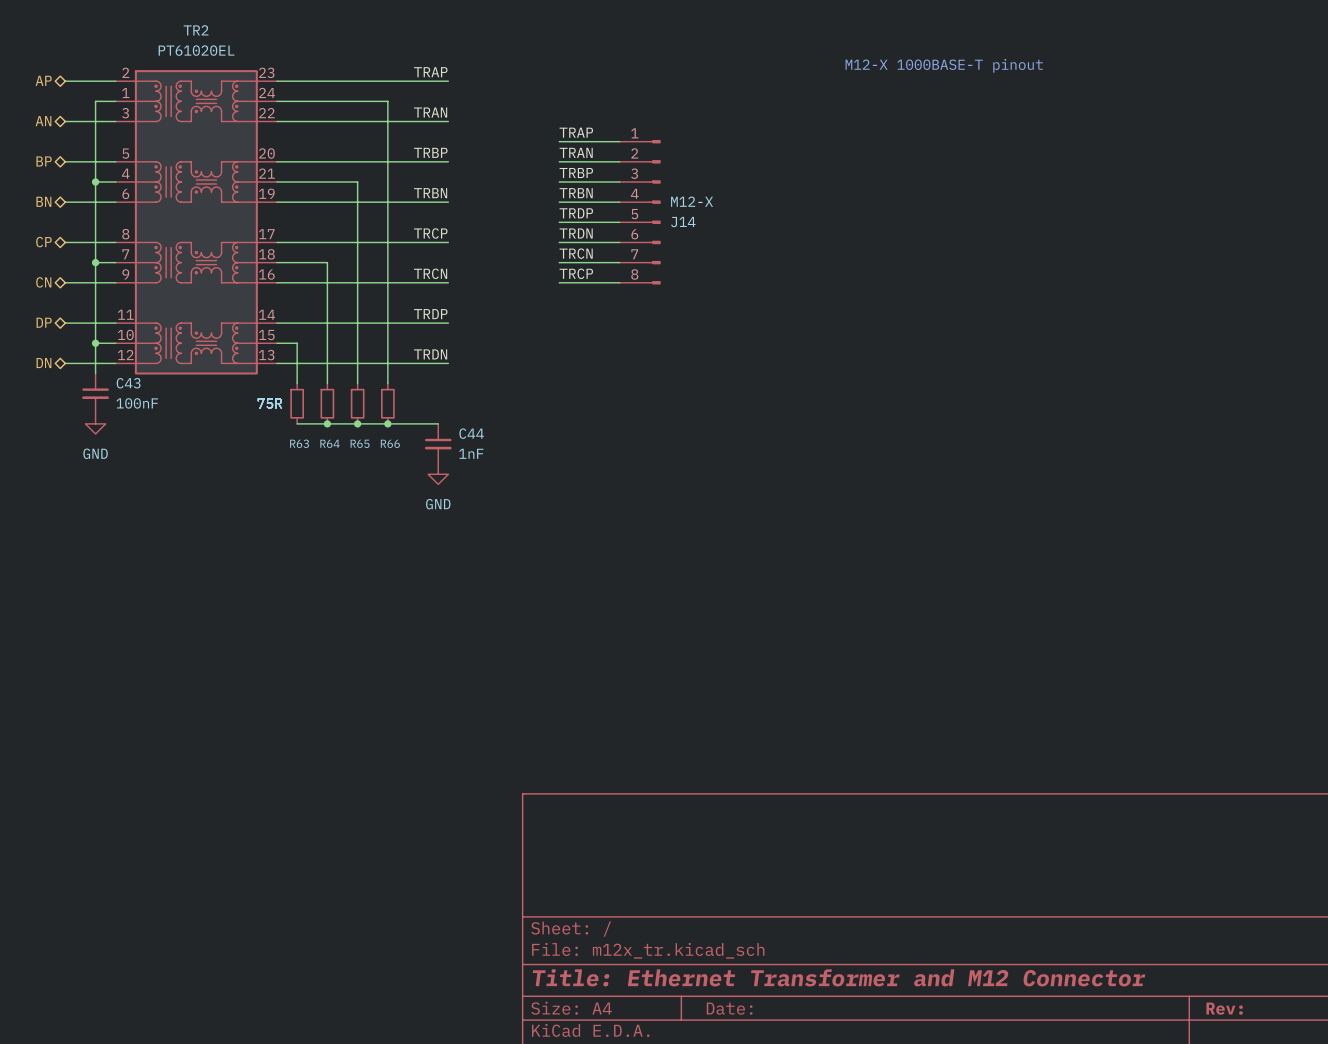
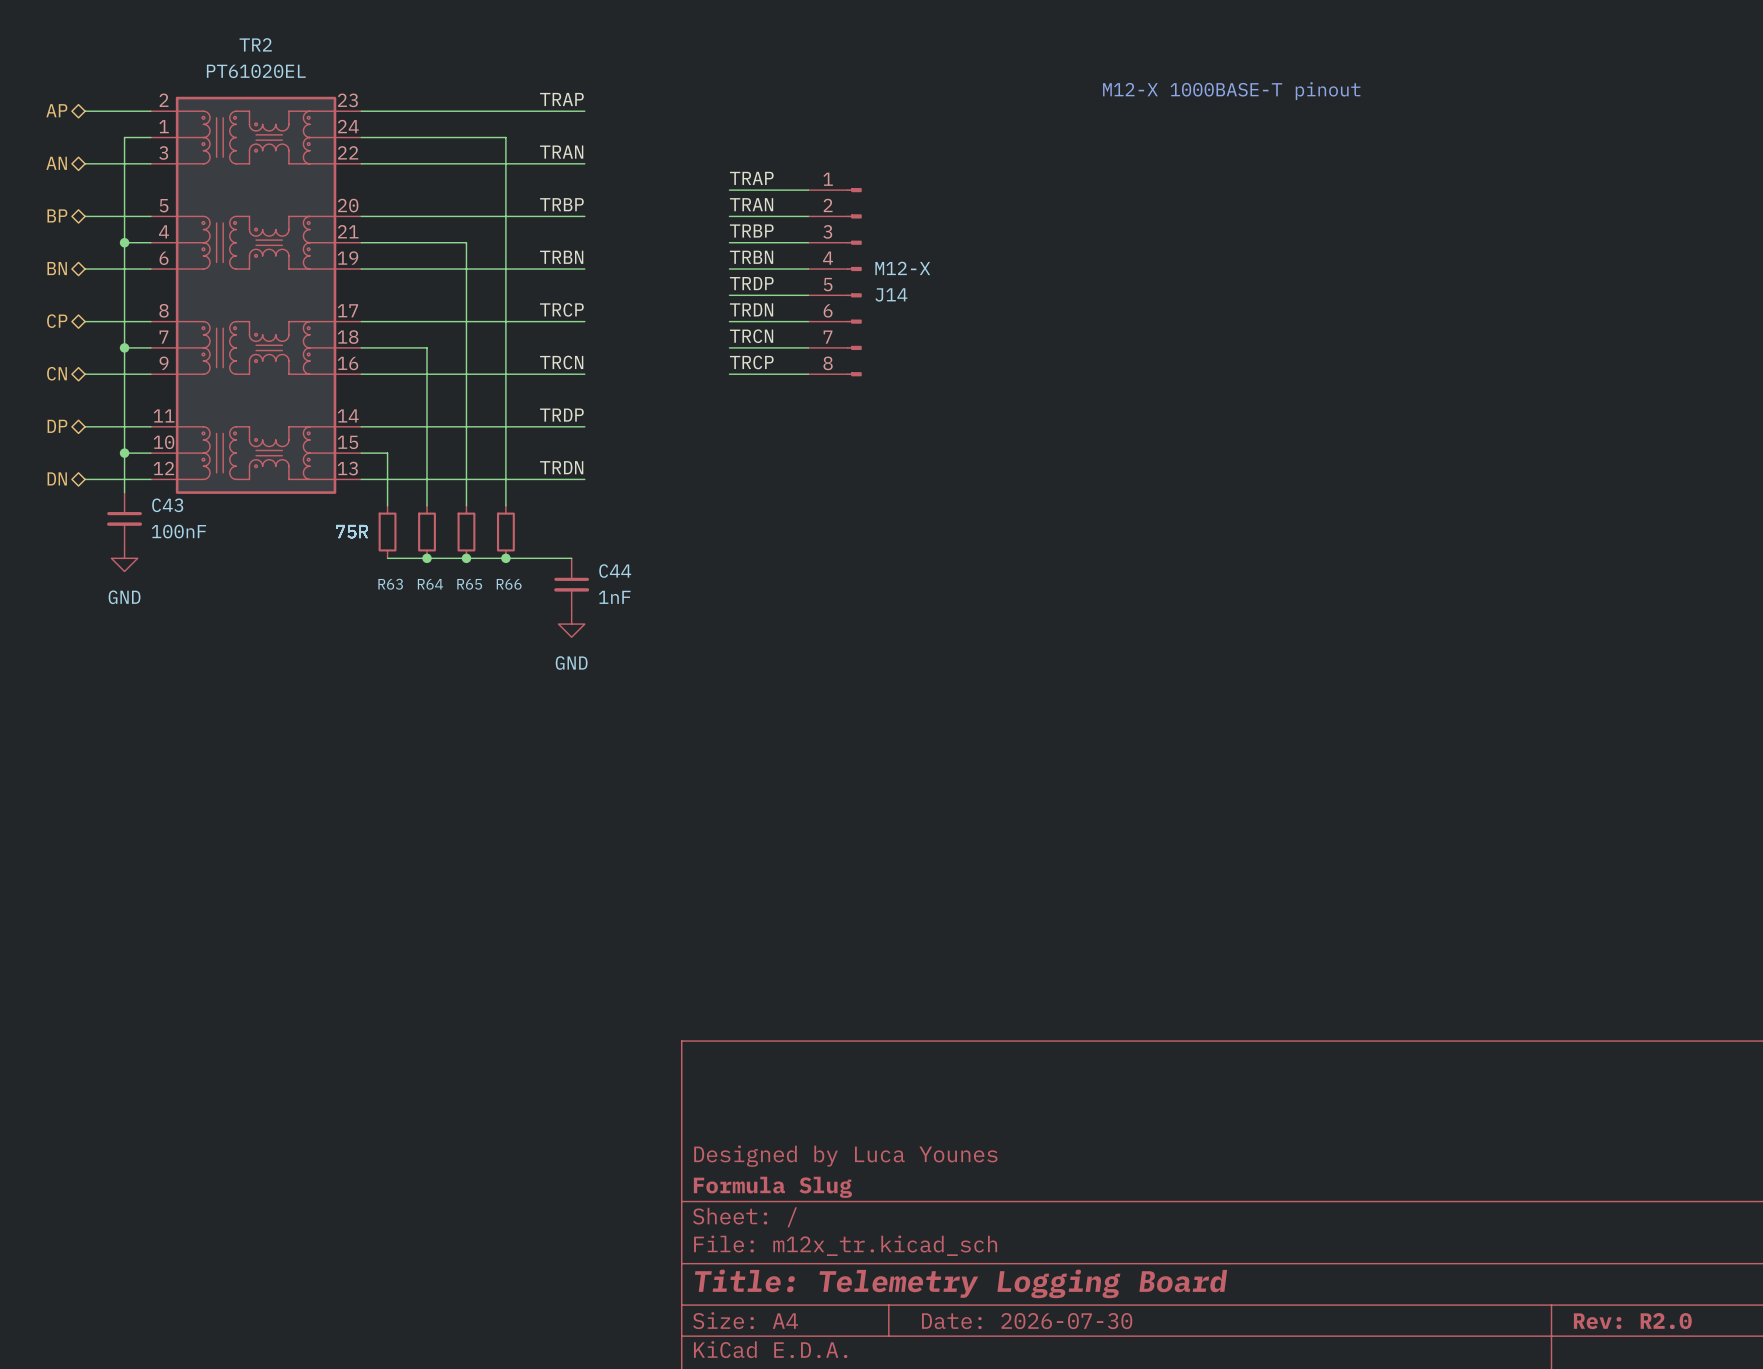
title block: none -> Designed by Luca Younes (845, 1156)
title block: none -> Formula Slug (772, 1187)
title block: Title: Ethernet Transformer and M12 Connector (838, 977) -> Title: Telemetry Logging Board (961, 1283)
title block: Date: (729, 1008) -> Date: 2026-07-30 (1027, 1321)
title block: Rev: (1224, 1008) -> Rev: R2.0 (1632, 1321)

